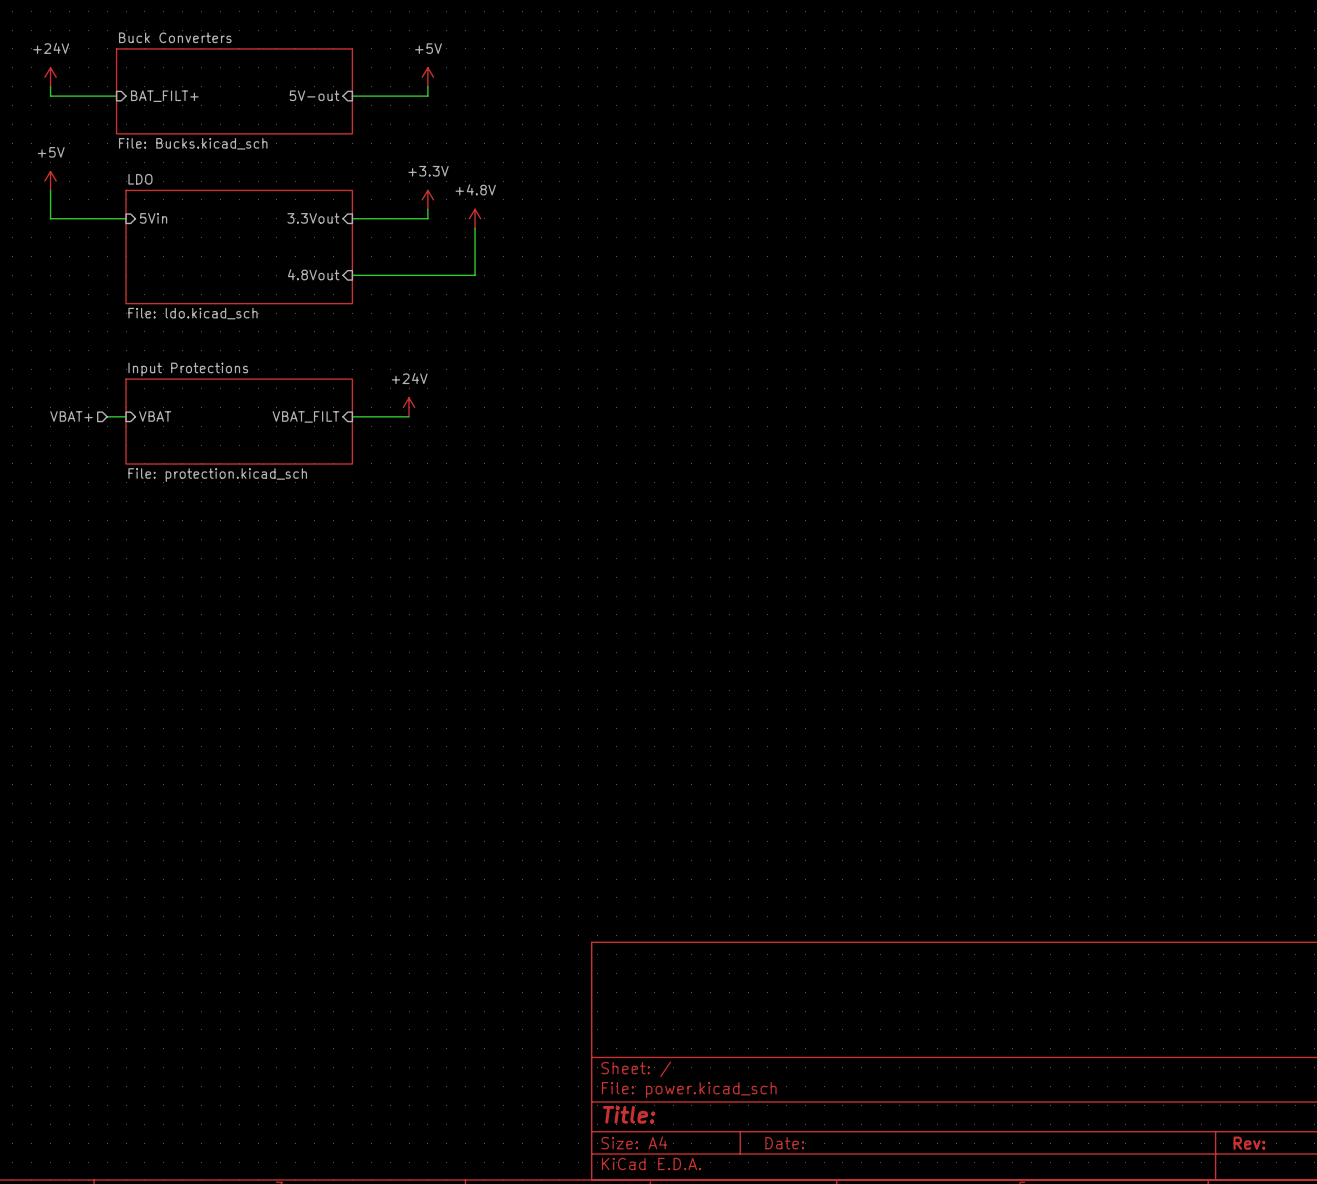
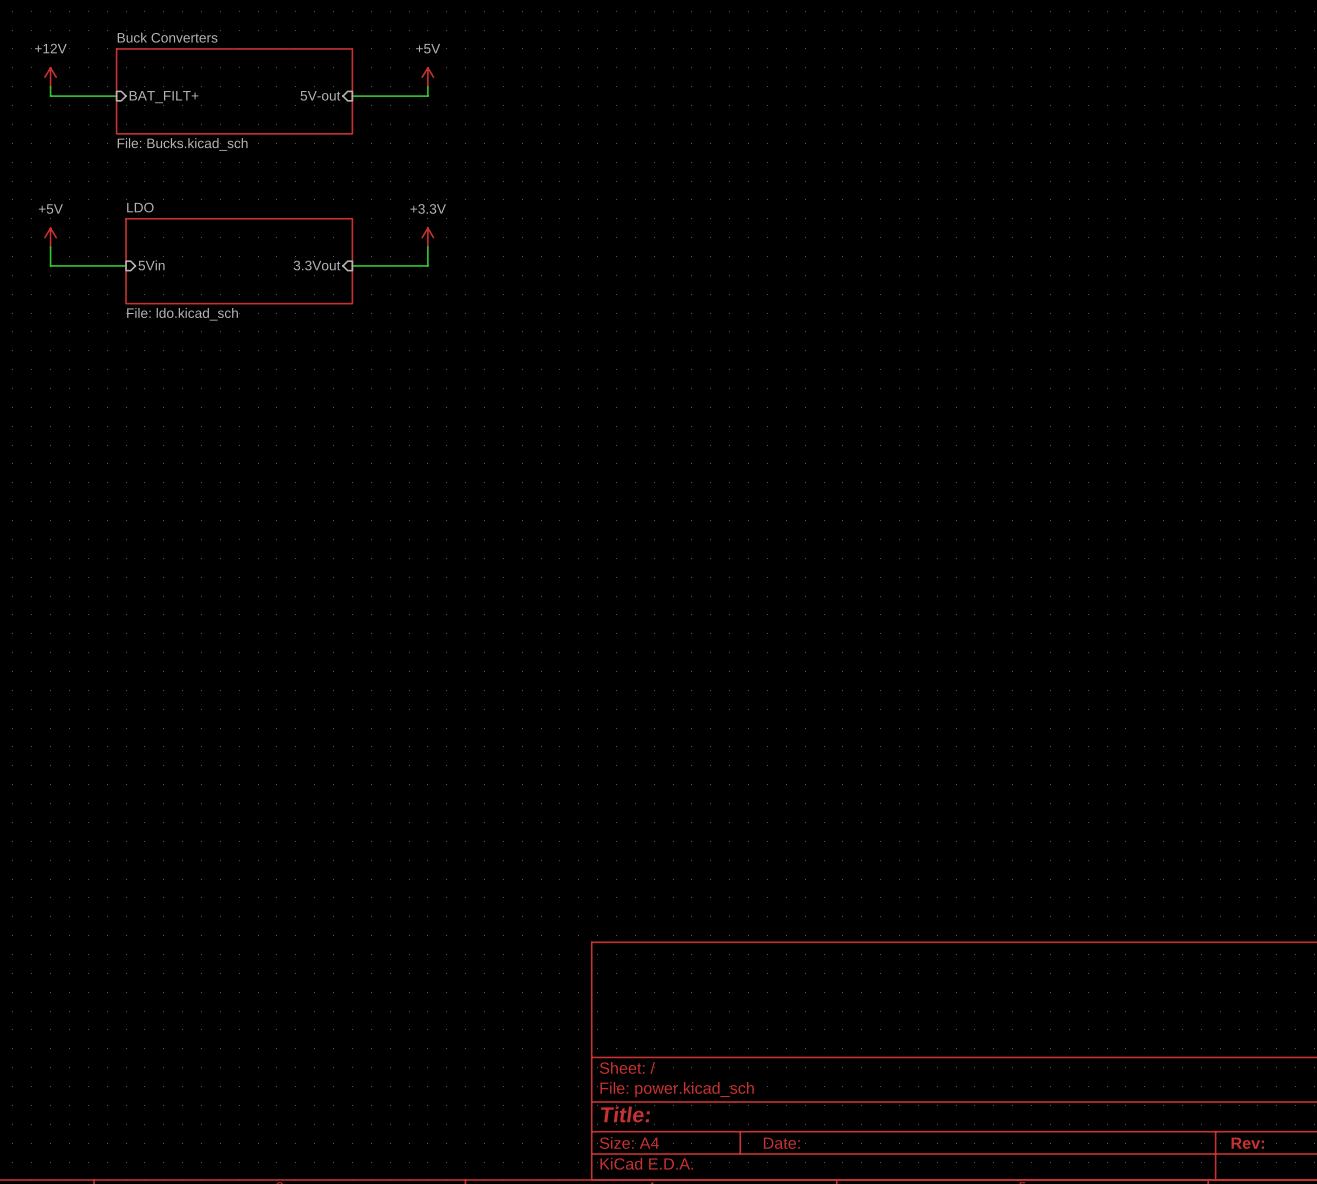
power symbol: +24V (50, 77) -> +12V (50, 77)
power symbol position: +5V (50, 181) -> +5V (50, 237)
wire: (50, 190) (50, 218) (126, 218) -> none
power symbol position: +3.3V (427, 199) -> +3.3V (427, 237)
wire: (427, 209) (427, 218) (352, 218) -> none
sheet pin position: 5Vin (153, 218) -> 5Vin (151, 265)
sheet pin position: 3.3Vout (313, 218) -> 3.3Vout (317, 265)
power symbol: +4.8V (475, 218) -> none
wire: (475, 228) (475, 275) (352, 275) -> none
wire: none -> (50, 247) (50, 265) (126, 265)
sheet LDO: File: ldo.kicad_sch (239, 247) -> none
wire: none -> (427, 247) (427, 265) (352, 265)
sheet LDO: none -> File: ldo.kicad_sch (239, 261)
sheet pin: 4.8Vout (313, 274) -> none
power symbol: +24V (409, 407) -> none
hierarchical label: VBAT+ (71, 416) -> none
wire: (107, 416) (126, 416) -> none
sheet pin: VBAT (155, 416) -> none
sheet pin: VBAT_FILT (305, 416) -> none
wire: (352, 416) (409, 416) -> none
sheet Input Protections: File: protection.kicad_sch (239, 421) -> none

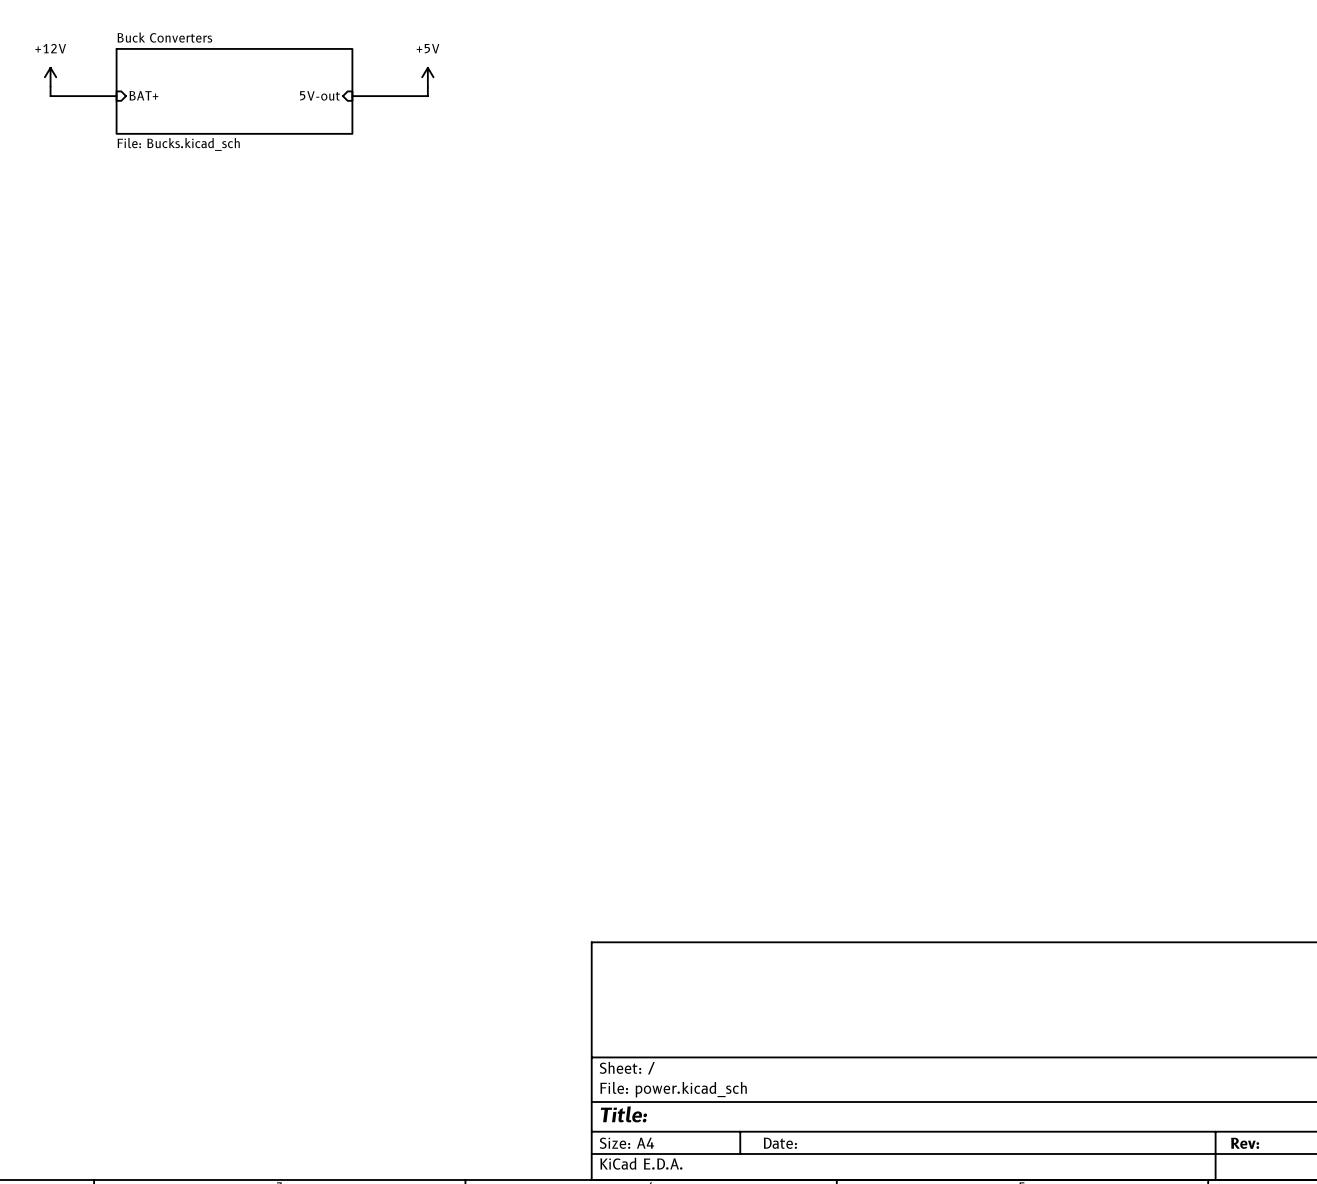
sheet pin: BAT_FILT+ (164, 97) -> BAT+ (143, 95)
power symbol: +5V (50, 237) -> none
power symbol: +3.3V (427, 237) -> none
wire: (50, 247) (50, 265) (126, 265) -> none
wire: (427, 247) (427, 265) (352, 265) -> none
sheet LDO: File: ldo.kicad_sch (239, 261) -> none
sheet pin: 5Vin (151, 265) -> none
sheet pin: 3.3Vout (317, 265) -> none

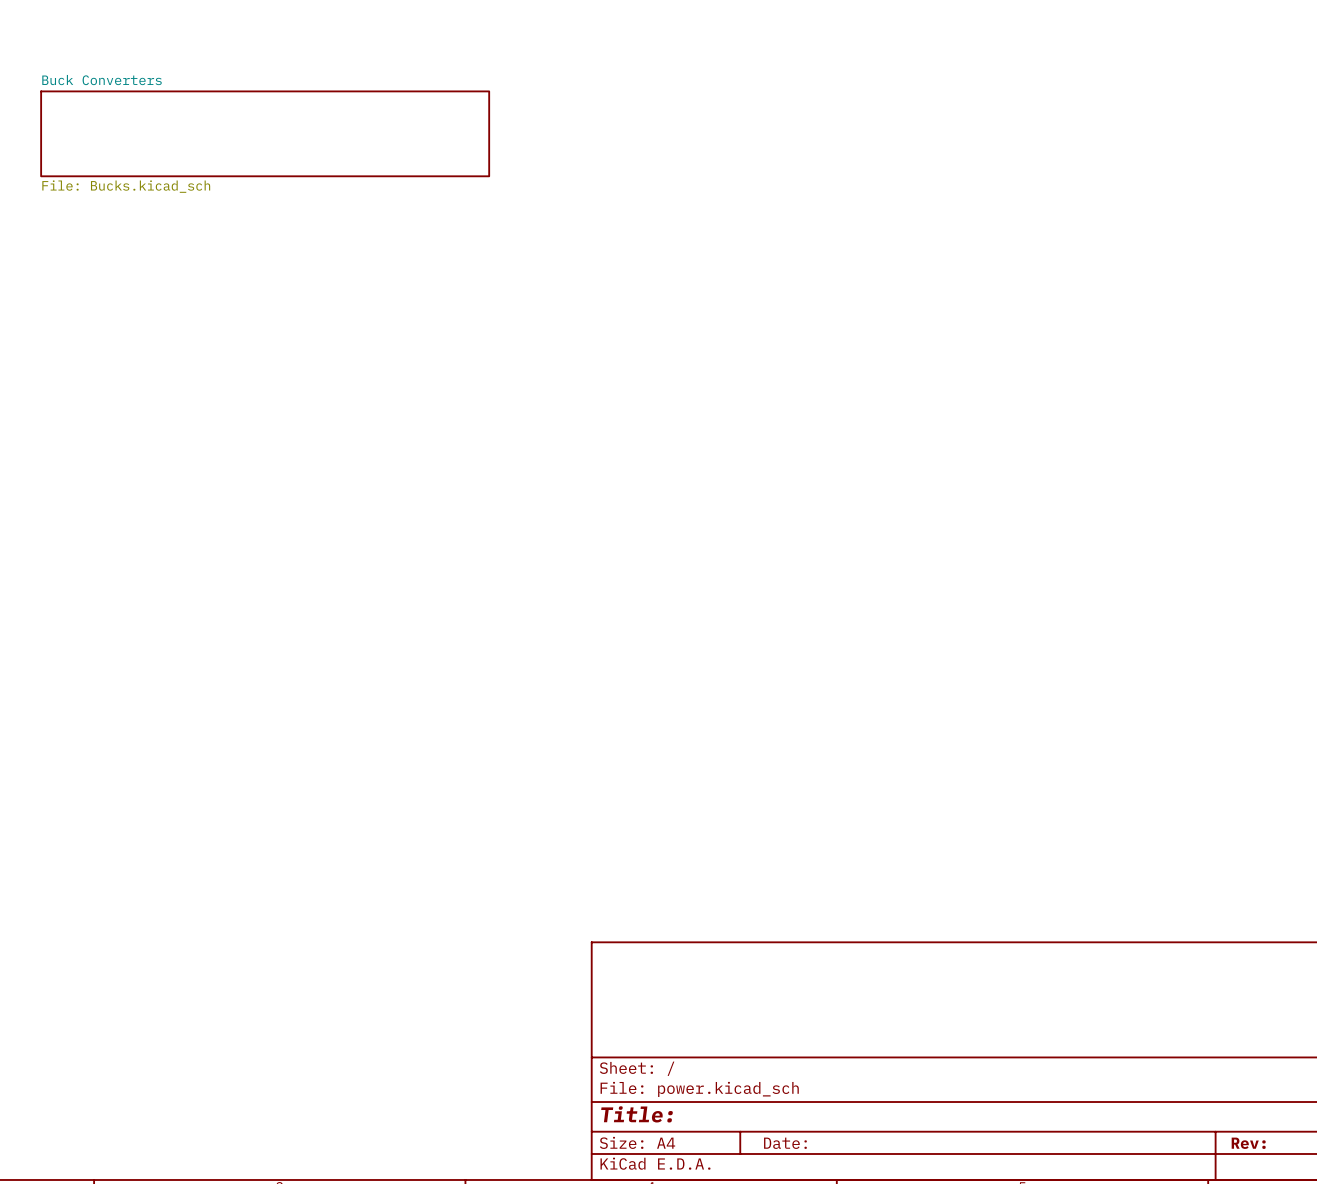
power symbol: +12V (50, 77) -> none
power symbol: +5V (427, 77) -> none
wire: (50, 86) (50, 96) (116, 96) -> none
wire: (427, 86) (427, 96) (352, 96) -> none
sheet Buck Converters: File: Bucks.kicad_sch (234, 91) -> none
sheet pin: BAT+ (143, 95) -> none
sheet pin: 5V-out (320, 95) -> none
sheet Buck Converters: none -> File: Bucks.kicad_sch (265, 133)

